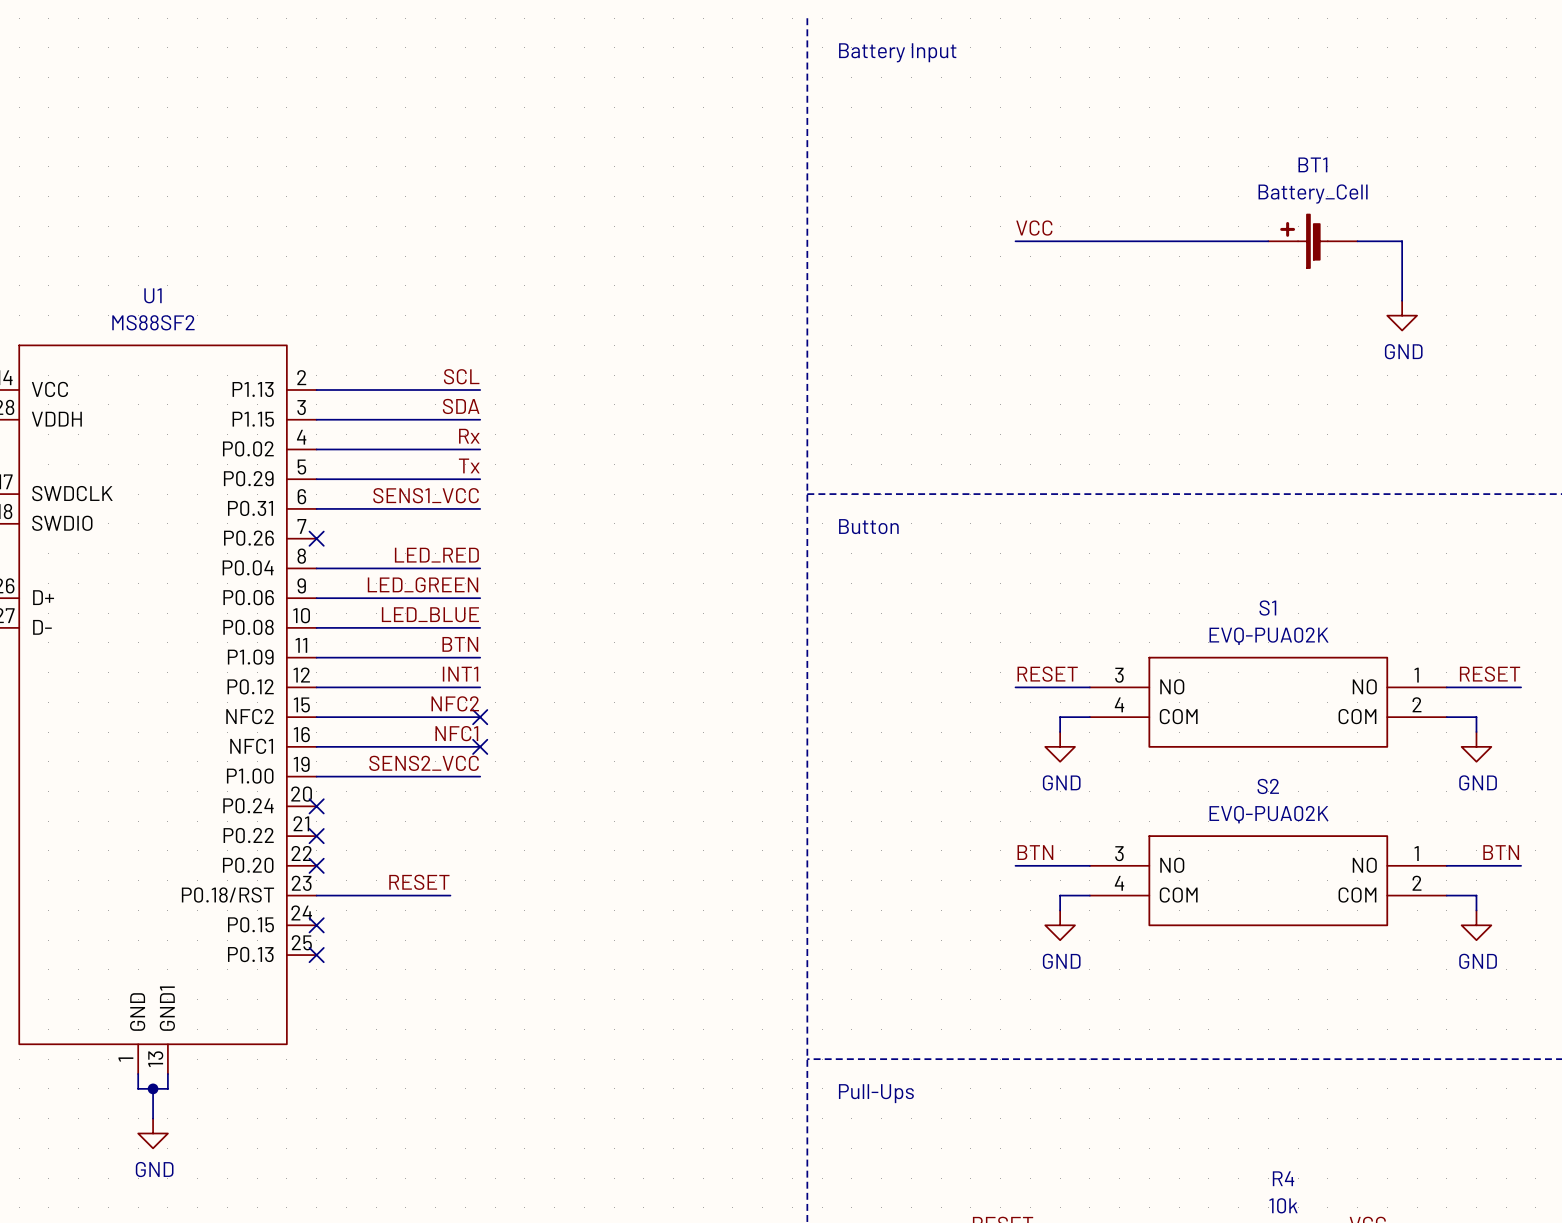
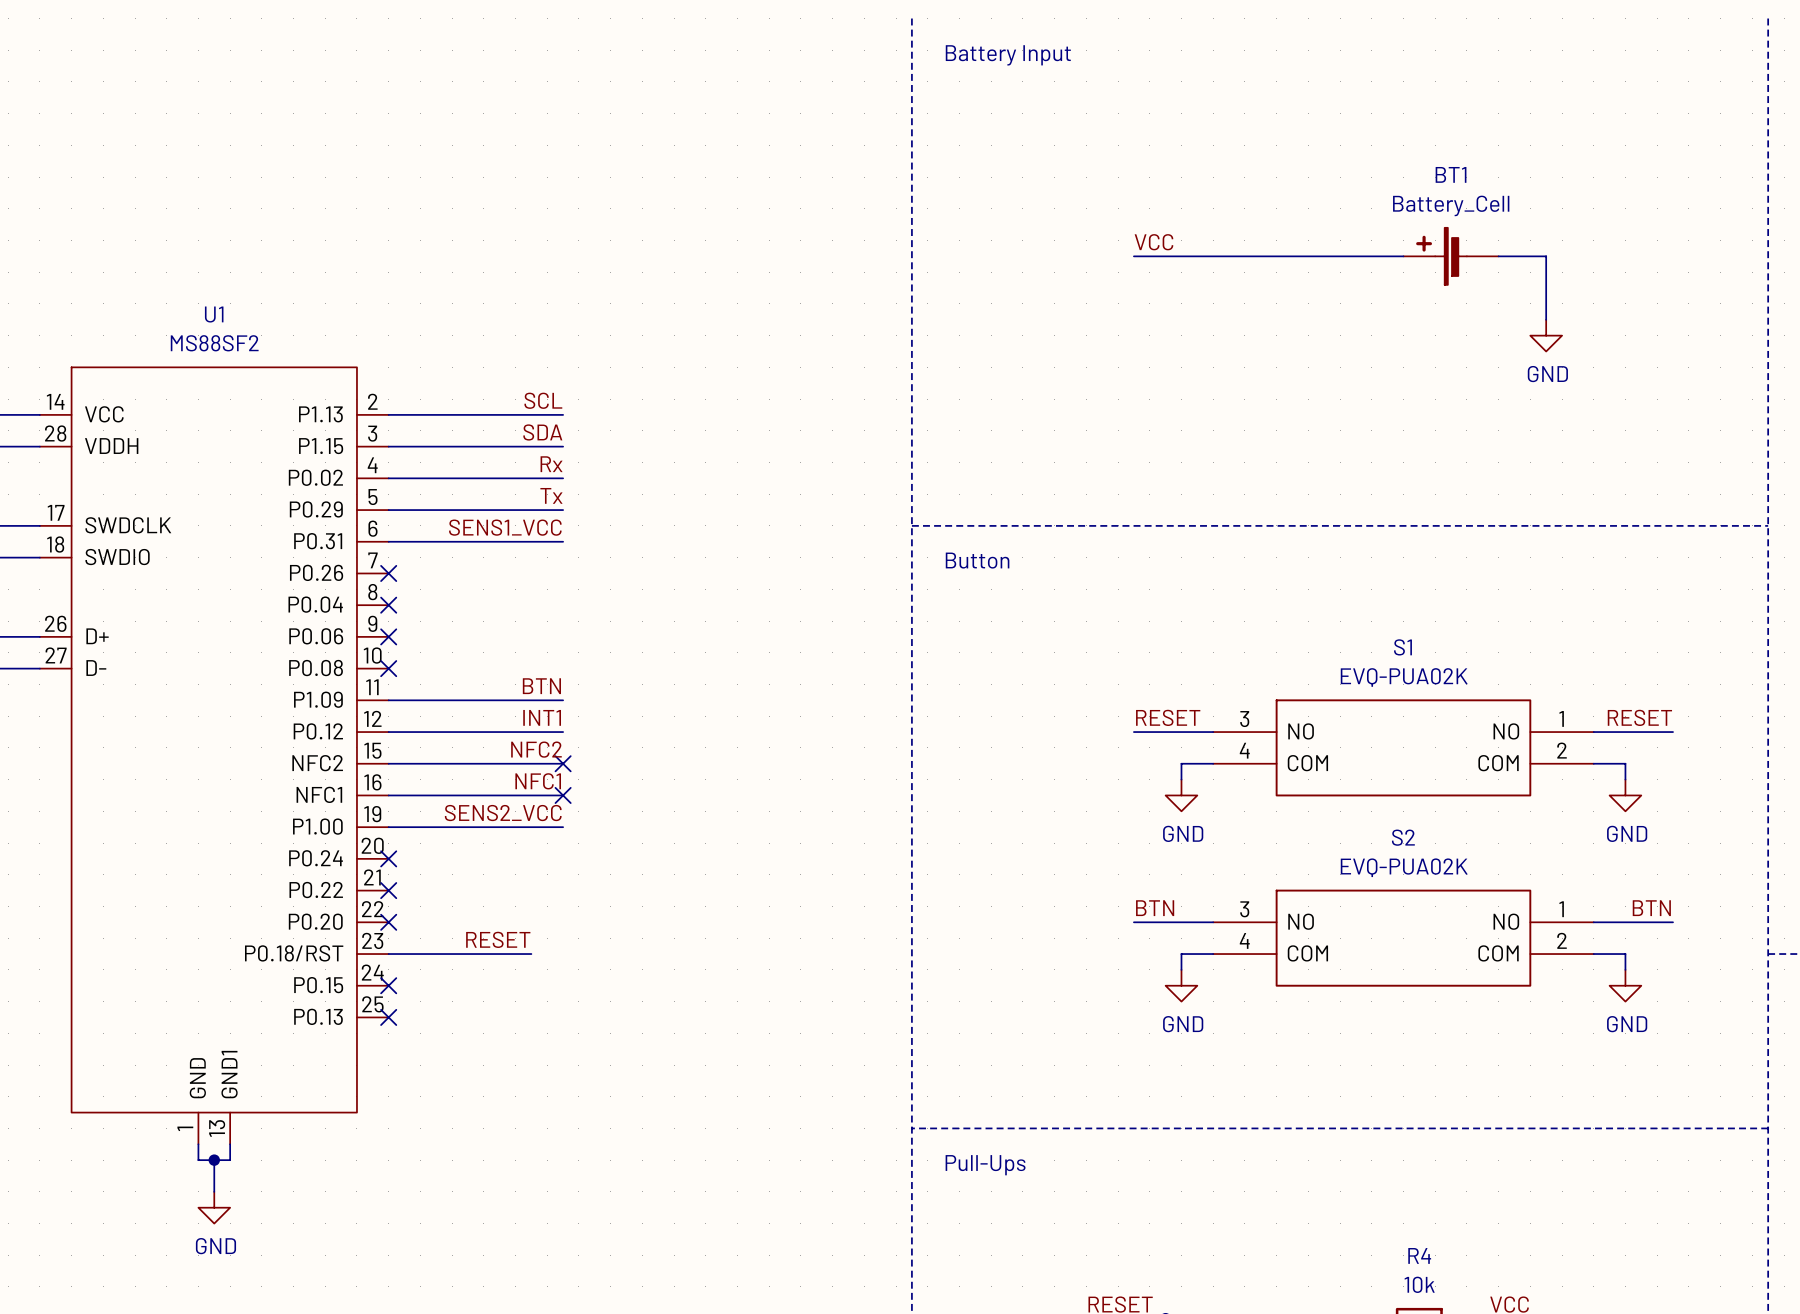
label: LED_RED (436, 555) -> none
wire: (316, 568) (480, 568) -> none
no-connect mark: none -> (388, 605)
label: LED_GREEN (422, 584) -> none
wire: (316, 598) (480, 598) -> none
no-connect mark: none -> (388, 636)
label: LED_BLUE (430, 614) -> none
wire: (316, 627) (480, 627) -> none
no-connect mark: none -> (388, 668)

